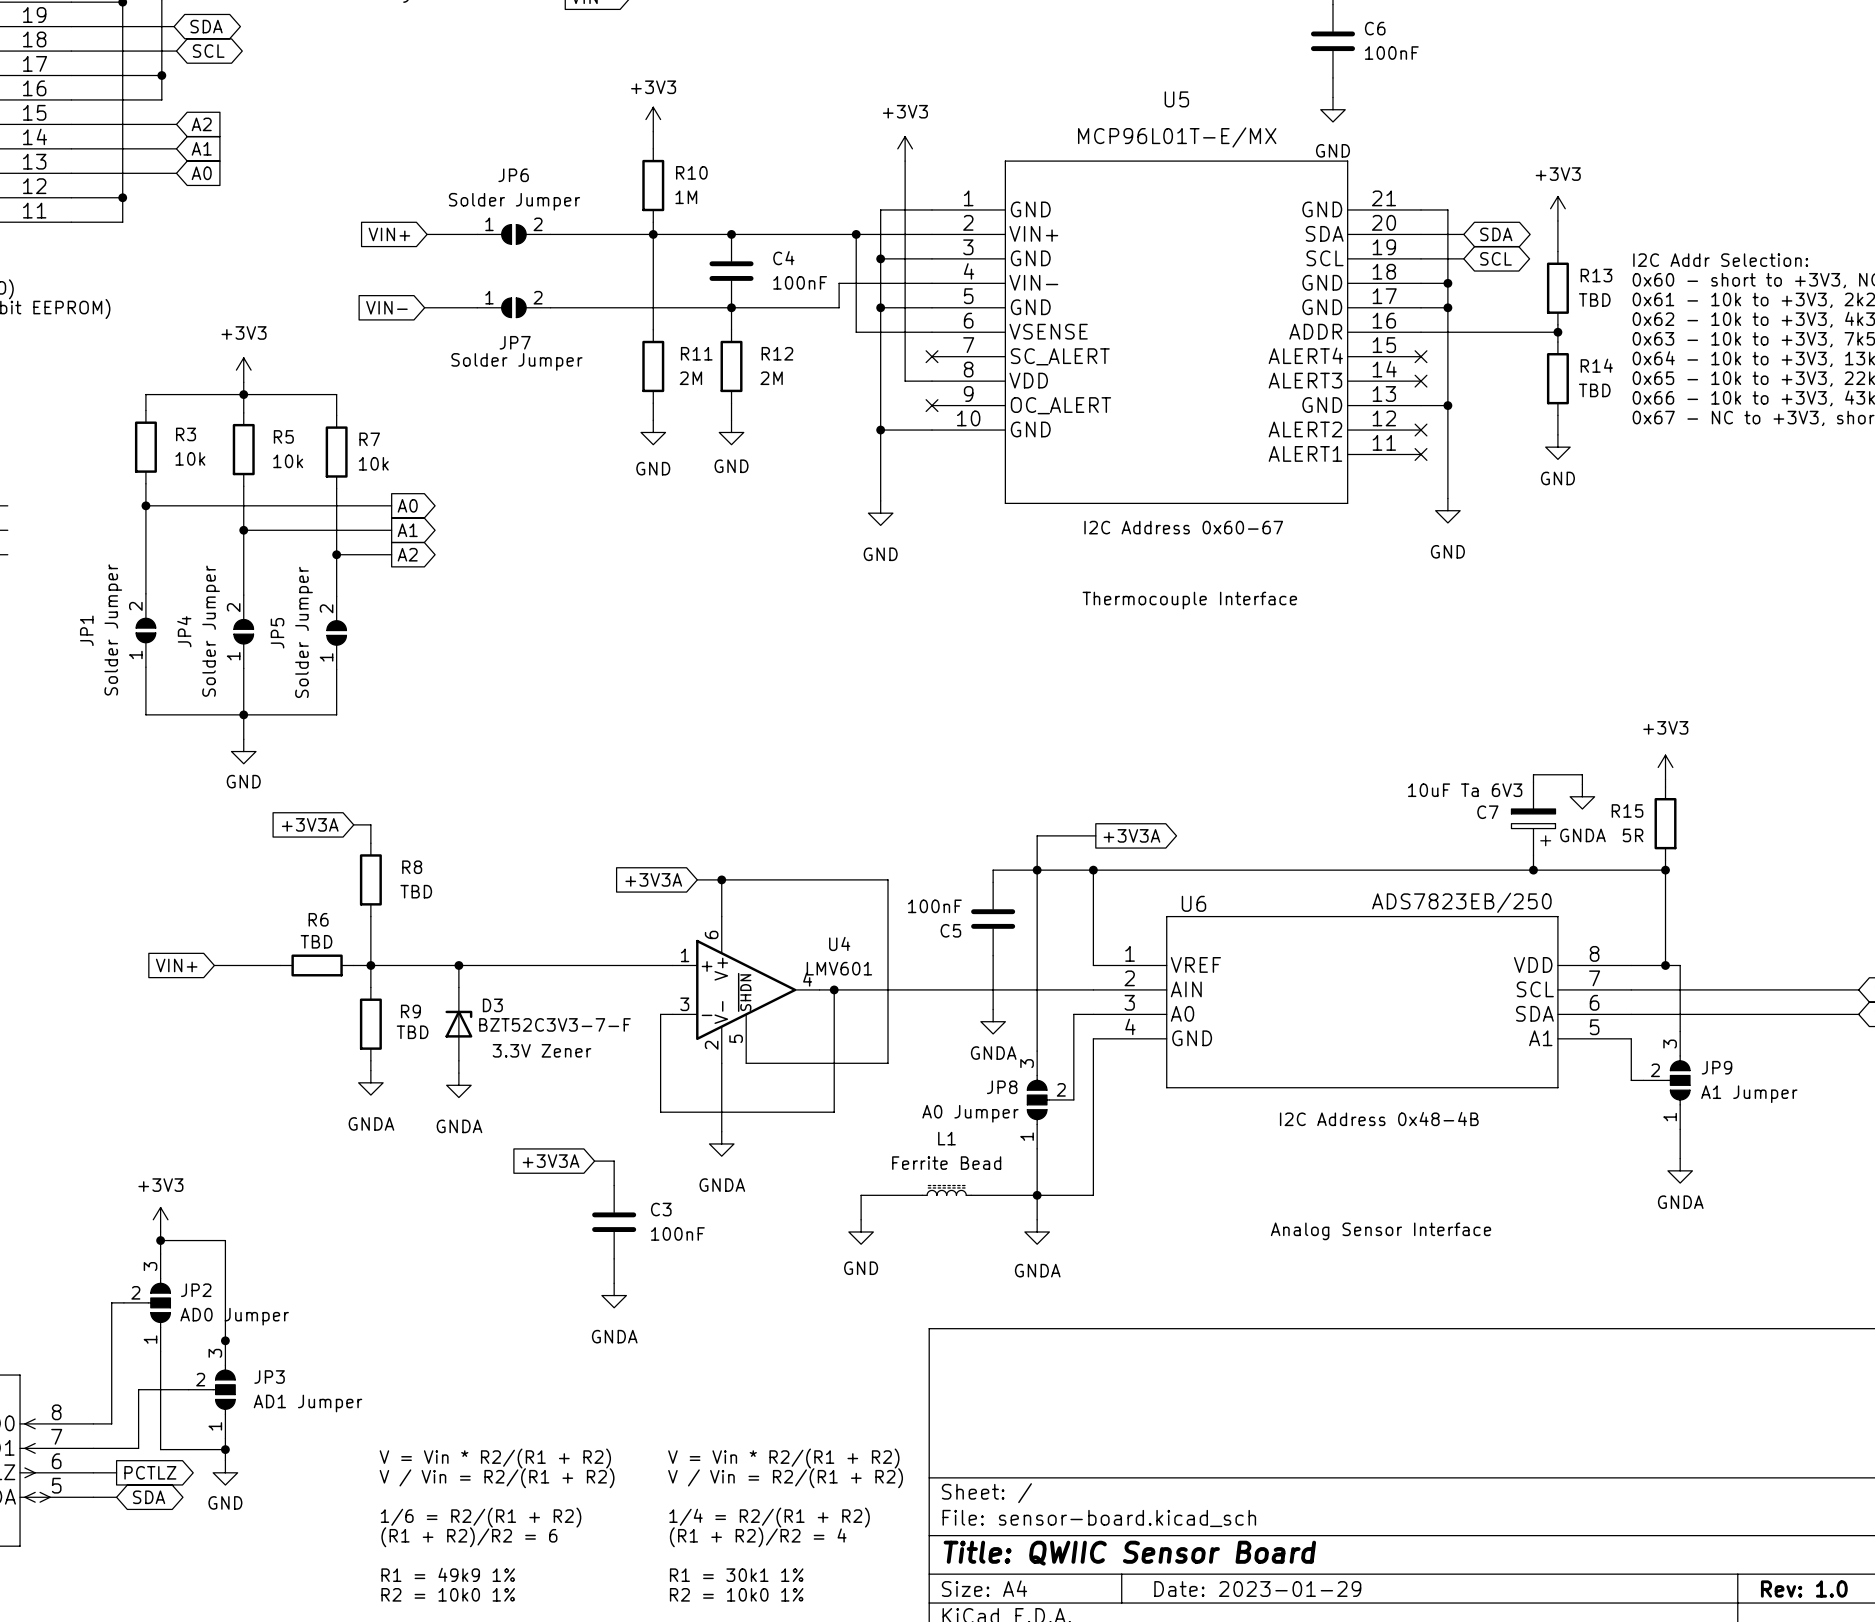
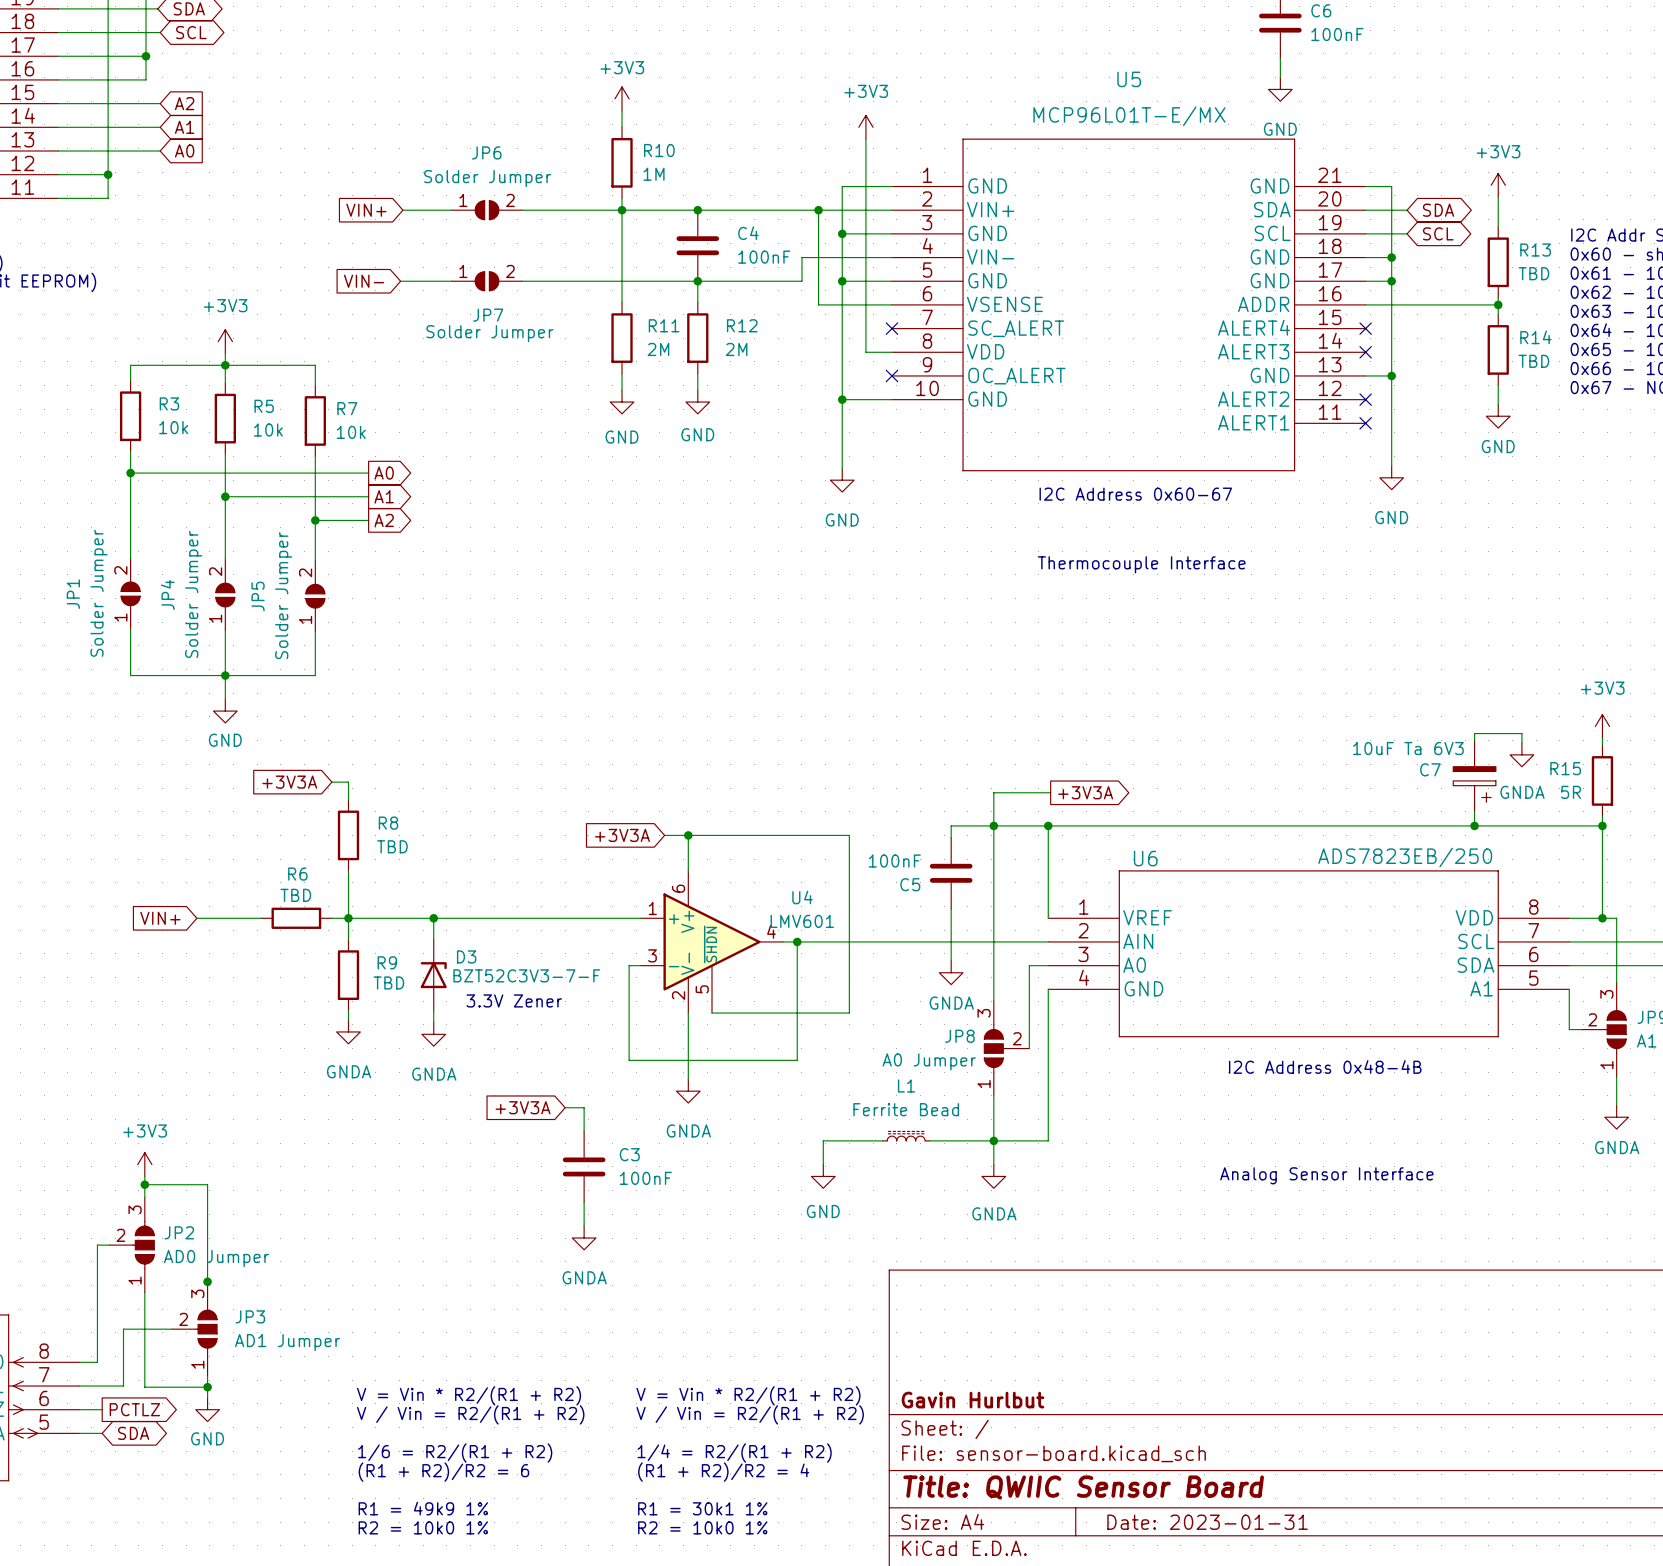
title block: none -> Gavin Hurlbut (973, 1400)
title block: Date: 2023-01-29 (1257, 1589) -> Date: 2023-01-31 (1207, 1522)

